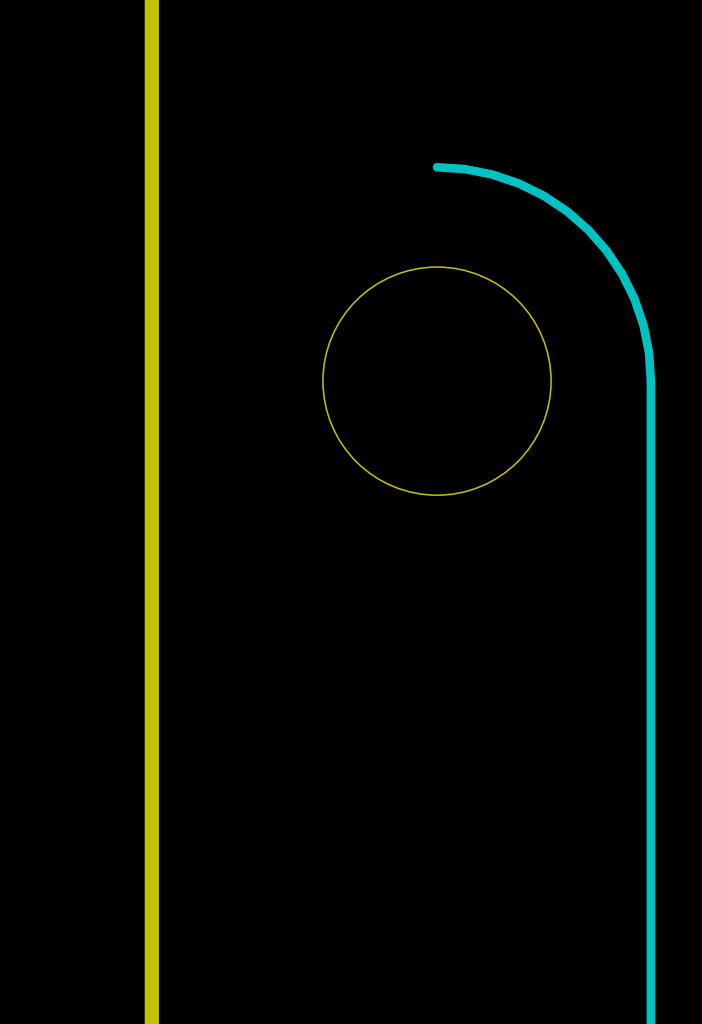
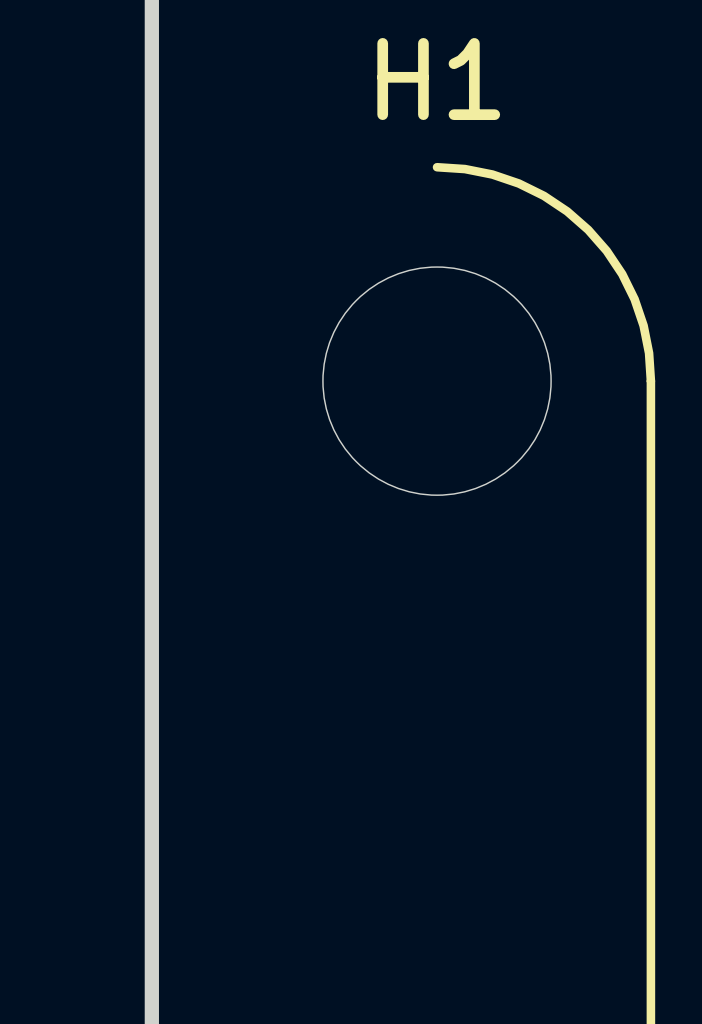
H1 name: none -> H1 (438, 79)

